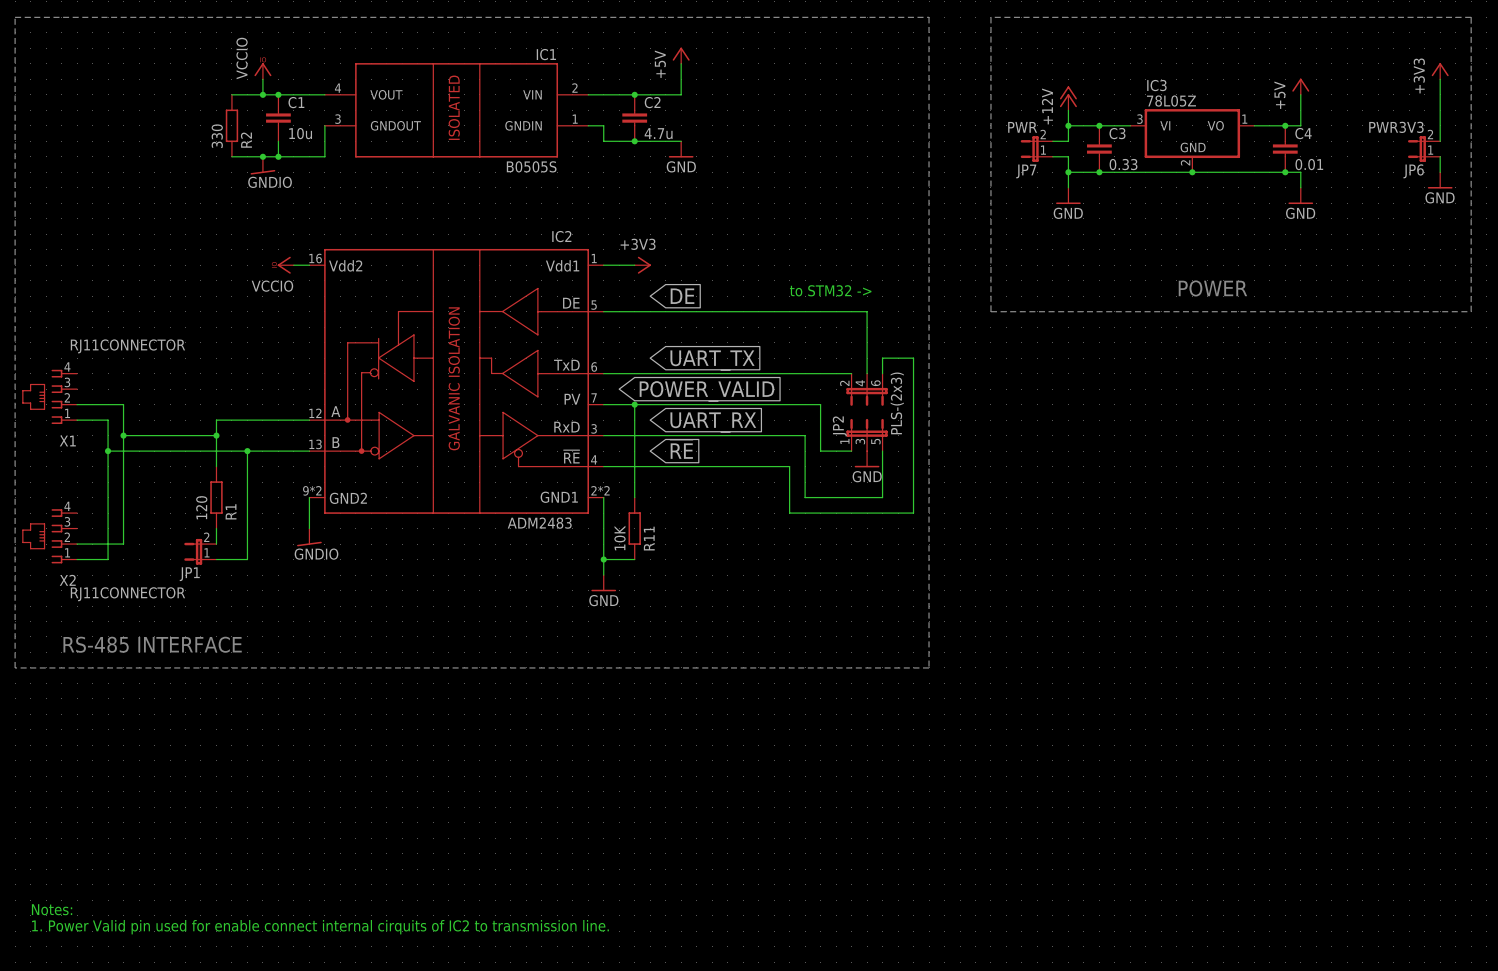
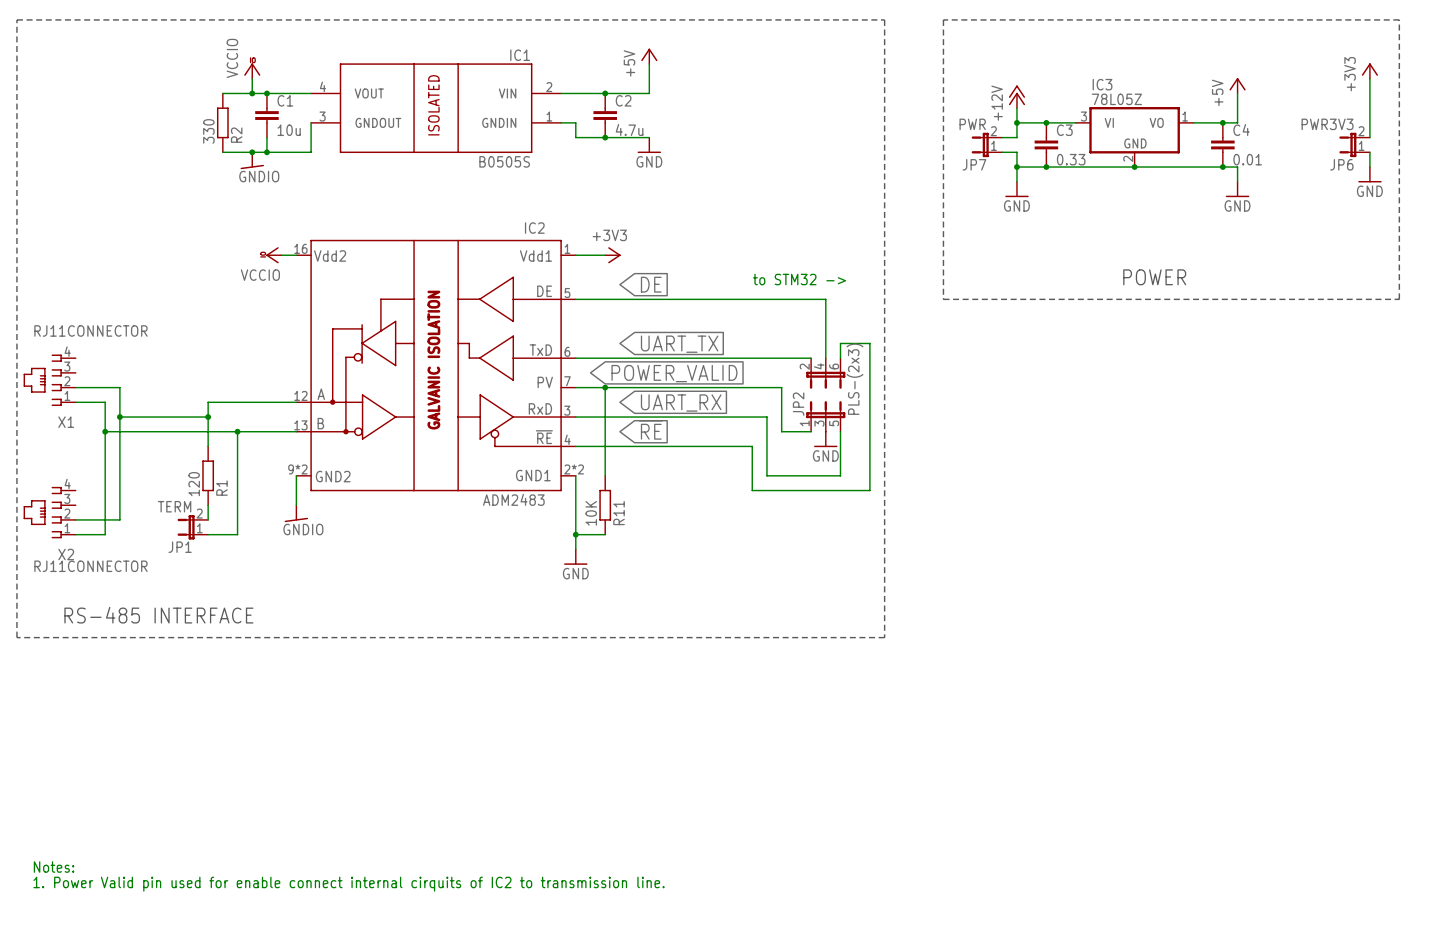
X1 value position: RJ11CONNECTOR (127, 346) -> RJ11CONNECTOR (90, 330)
JP1 value: none -> TERM (174, 506)
X2 value position: RJ11CONNECTOR (127, 594) -> RJ11CONNECTOR (90, 566)

